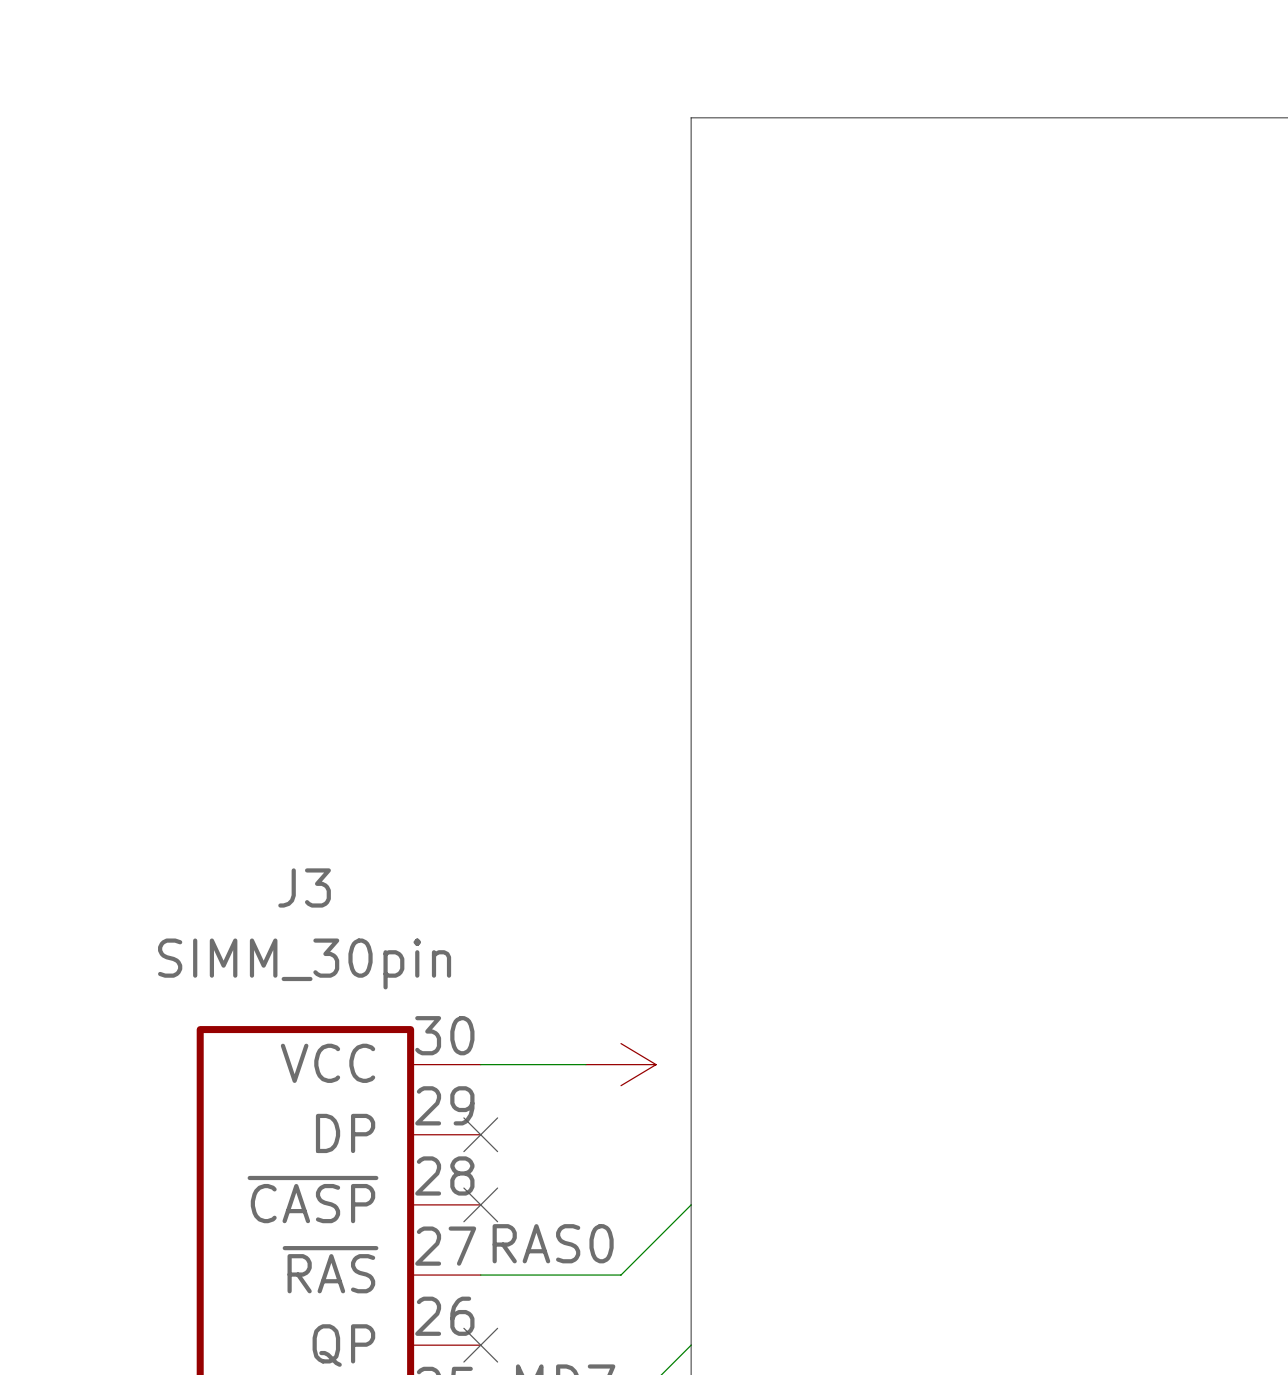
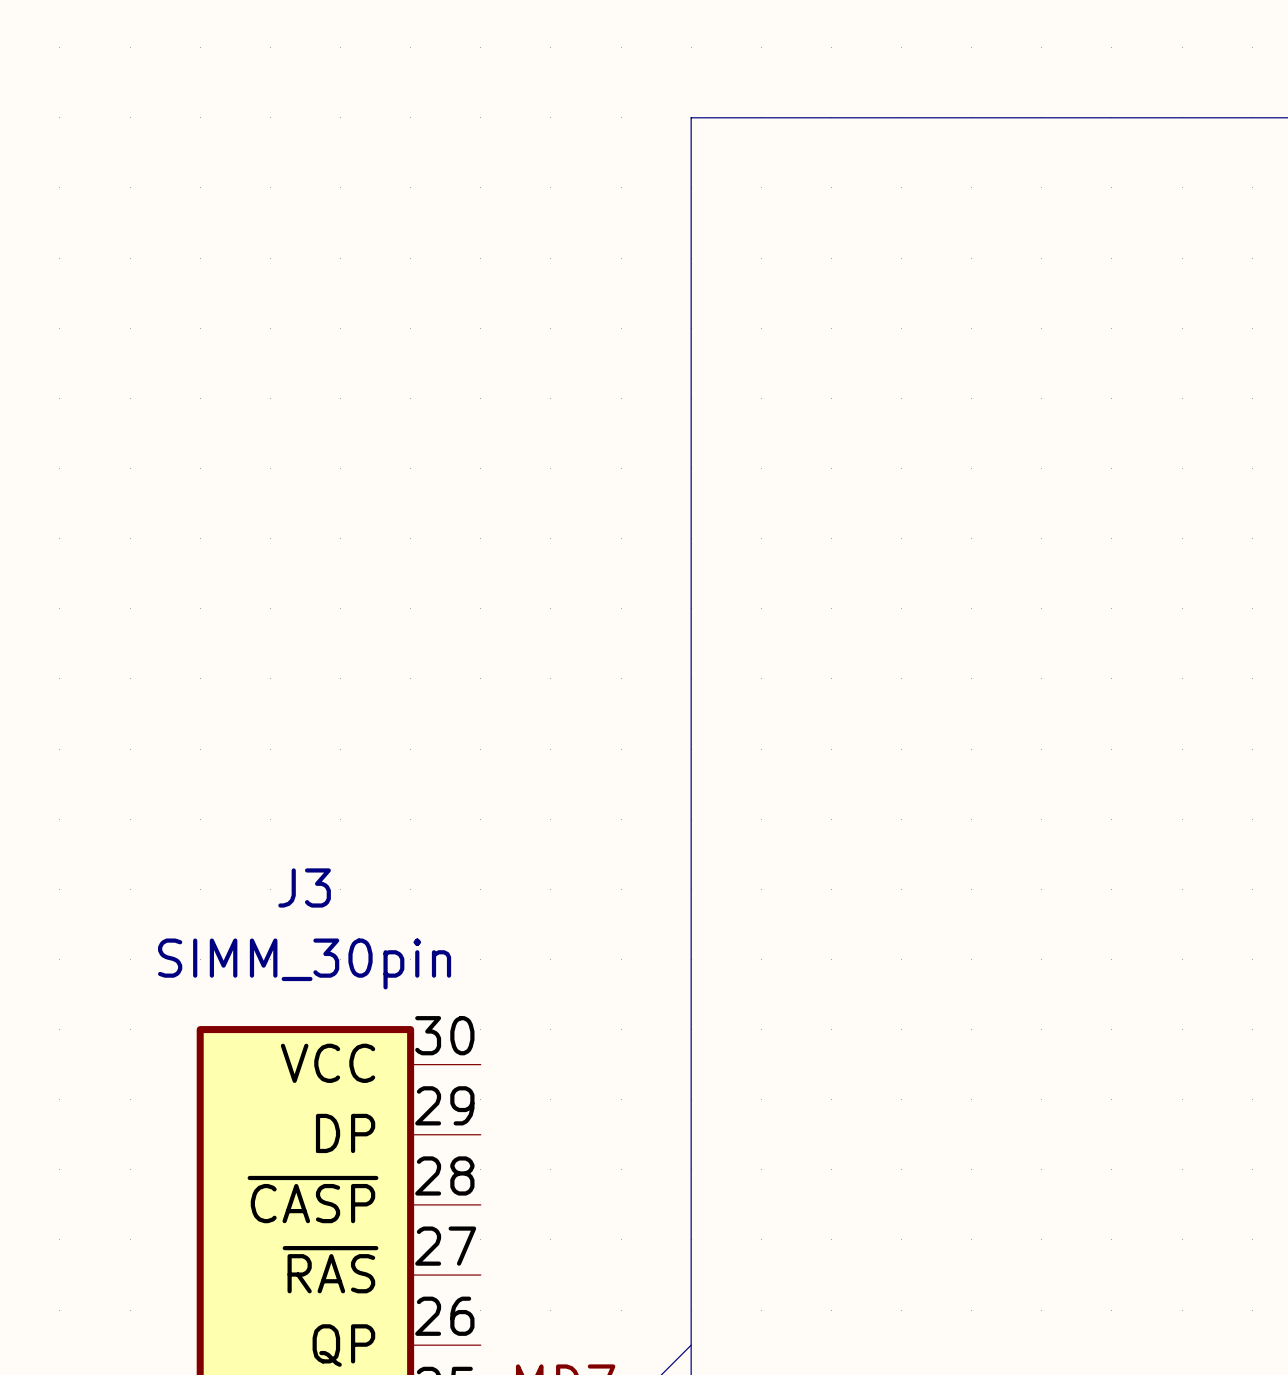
wire: (480, 1064) (585, 1064) -> none
power symbol: (621, 1064) -> none
no-connect mark: (480, 1134) -> none
no-connect mark: (480, 1204) -> none
wire: (691, 1204) (621, 1275) (480, 1275) -> none
label: RAS0 (553, 1243) -> none
no-connect mark: (480, 1345) -> none

